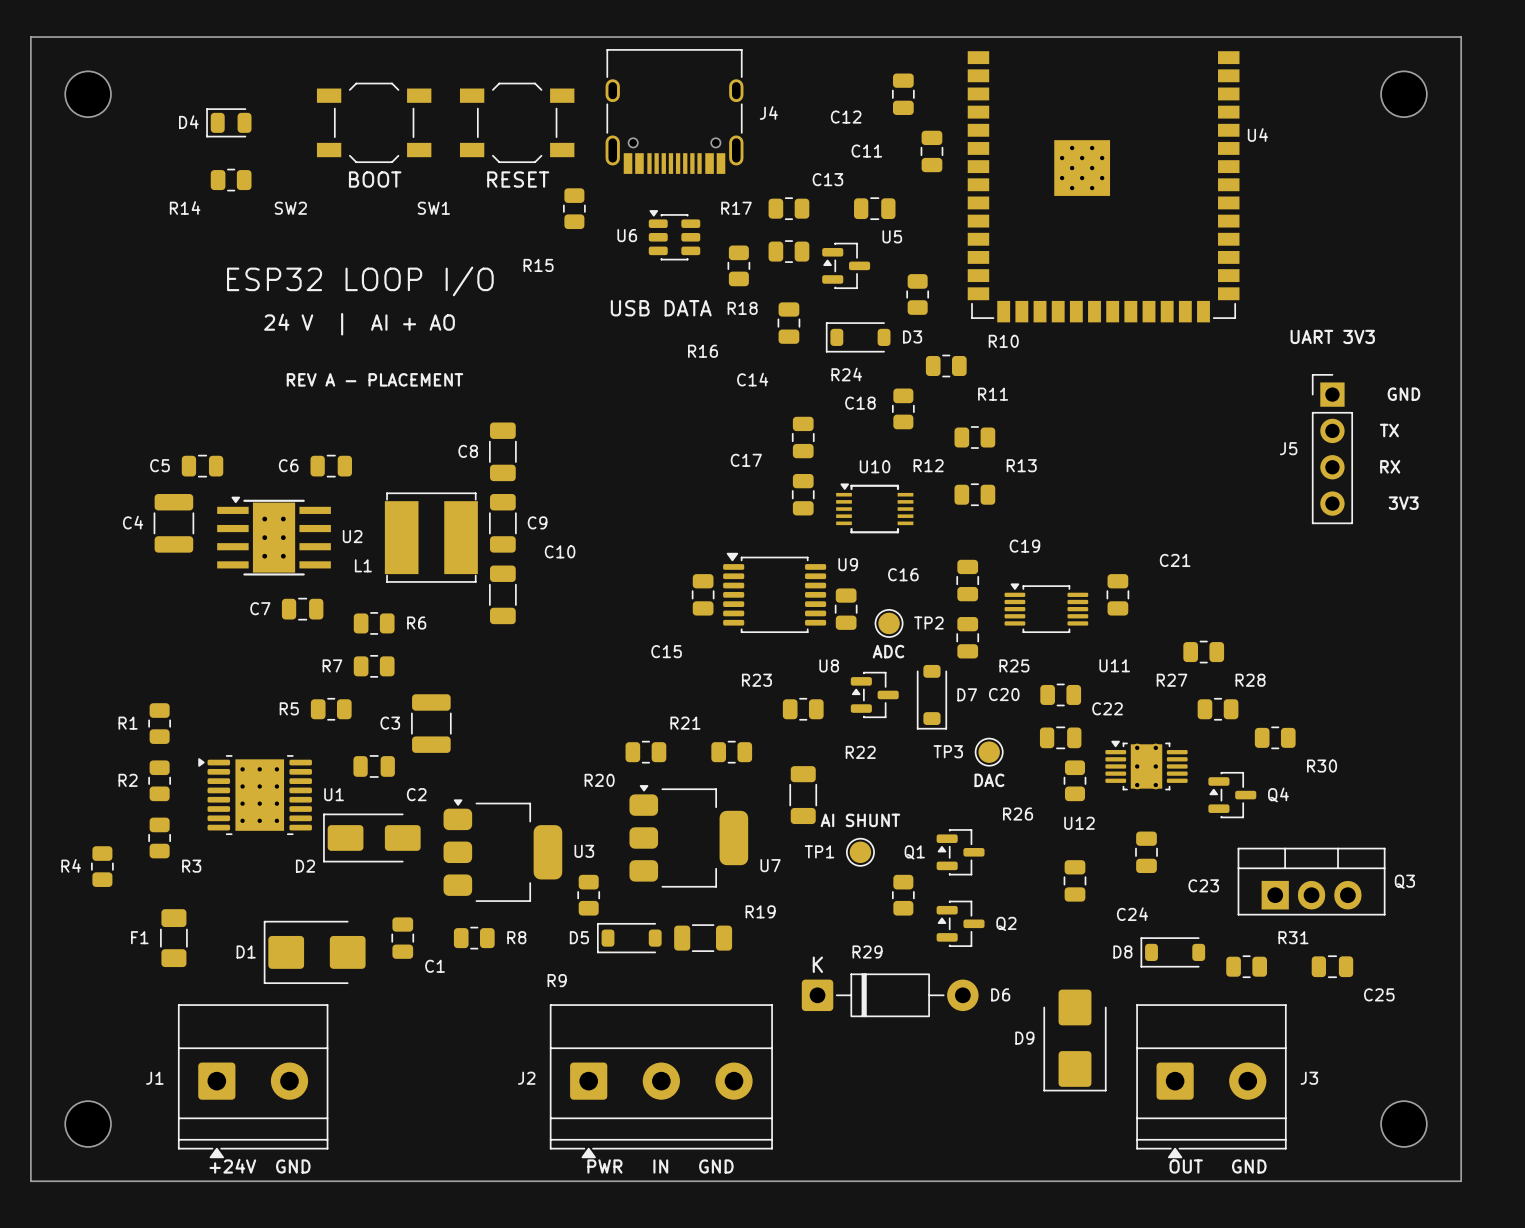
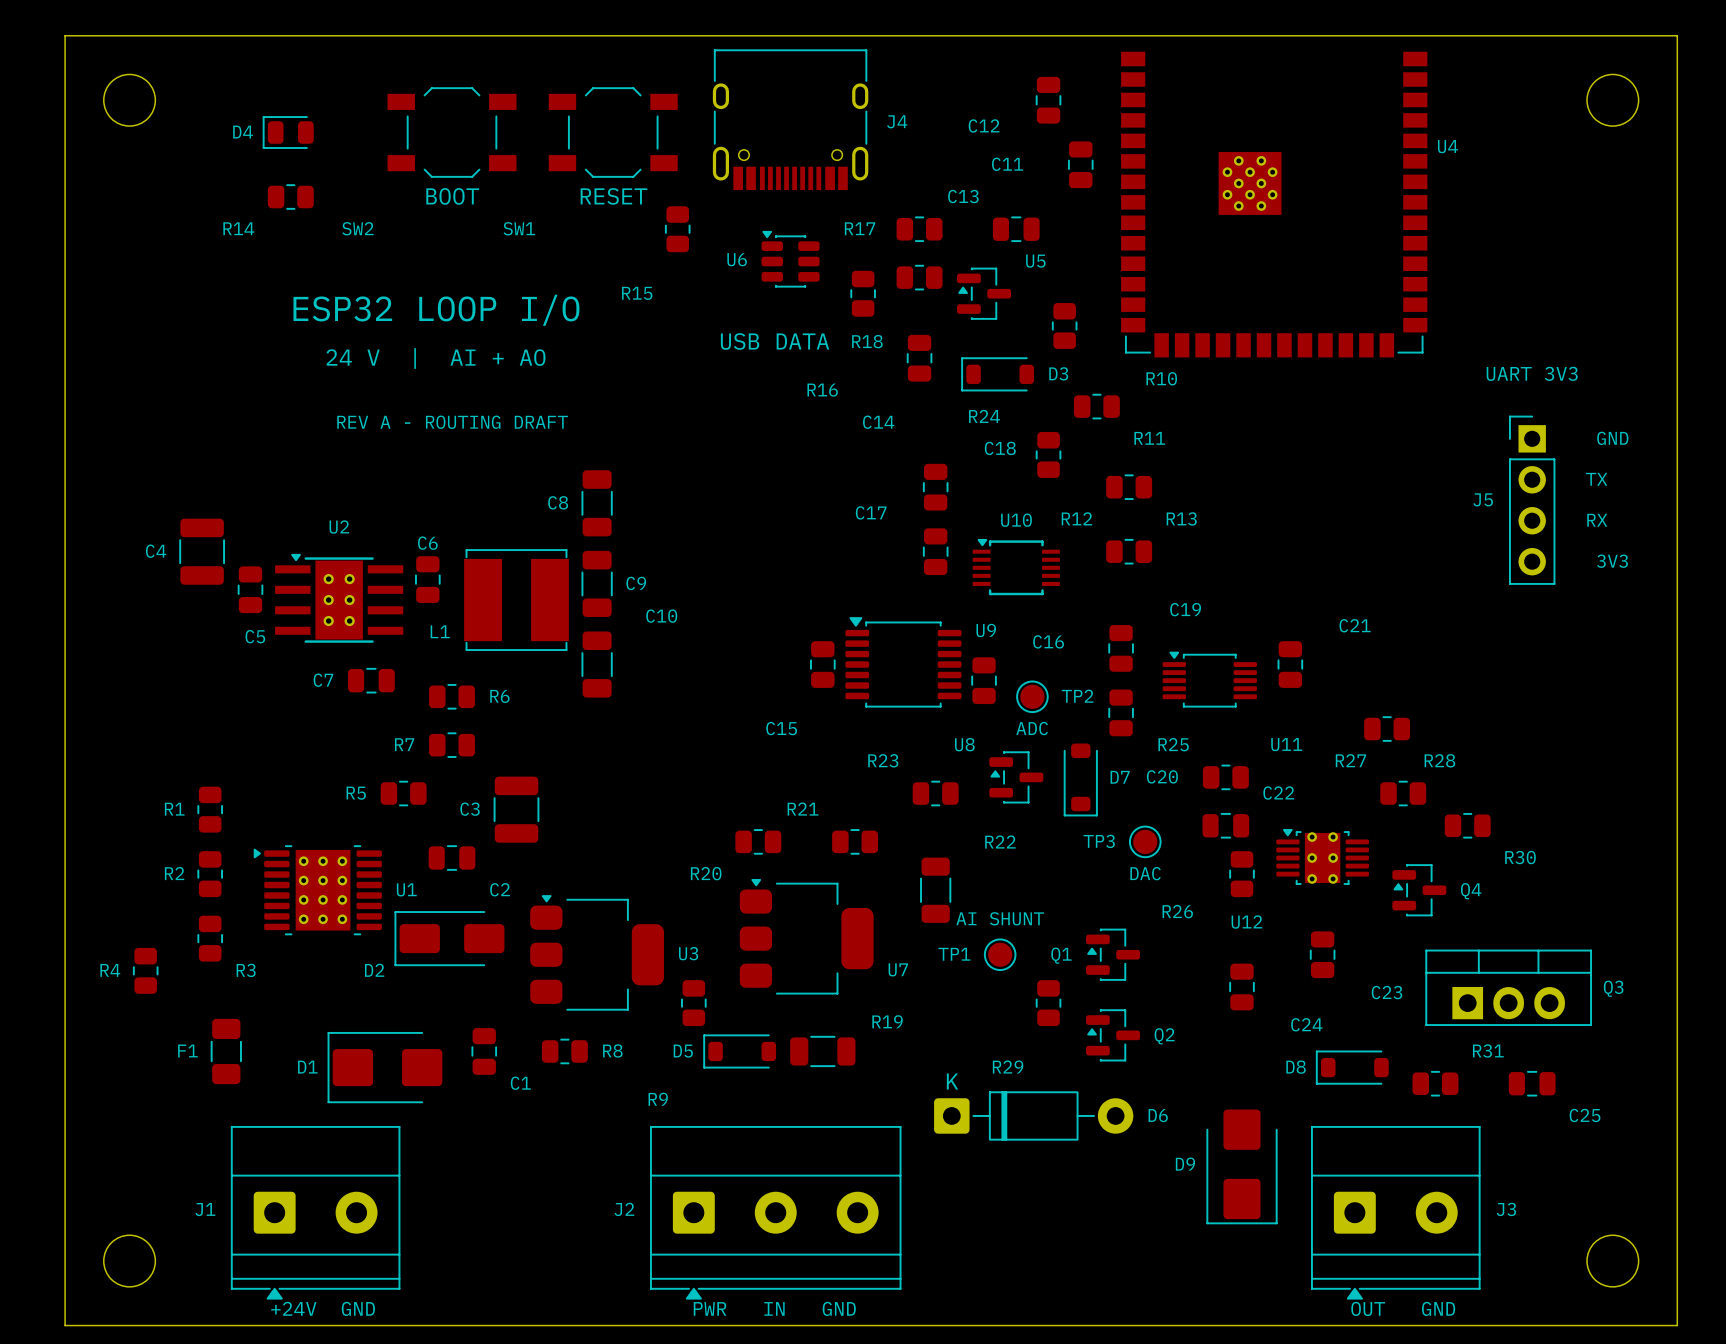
text: REV A - PLACEMENT (374, 379) -> REV A - ROUTING DRAFT (452, 422)
C5 name position: C5 (159, 465) -> C5 (255, 636)
C5 rotation: 0° (202, 466) -> 90° clockwise (250, 589)
C5 position: (202, 466) -> (250, 589)
C6 rotation: 0° (331, 466) -> 90° clockwise (427, 579)
C6 position: (331, 466) -> (427, 579)
C4 position: (173, 523) -> (202, 551)
U2 name position: U2 (352, 536) -> U2 (339, 527)

